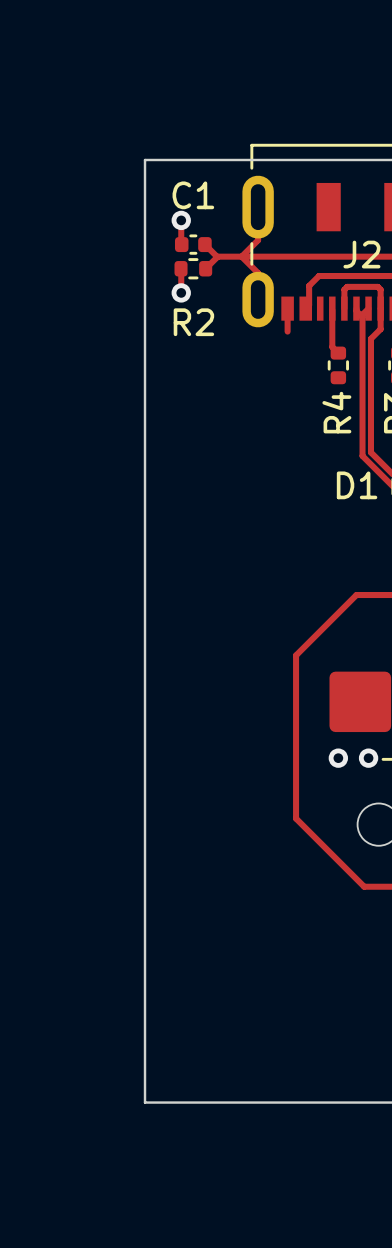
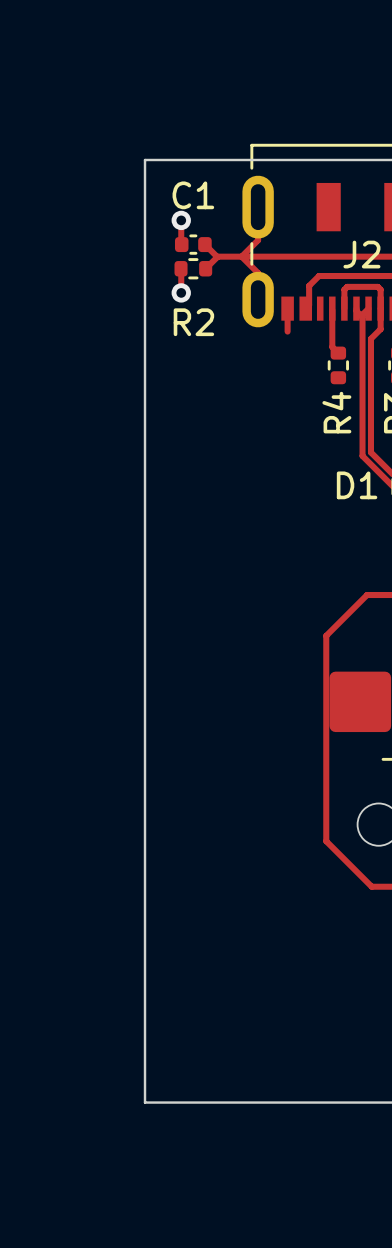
track: (367, 595) (356, 595) (296, 655) (296, 818) (364, 886) (371, 886) -> (367, 595) (326, 635) (326, 841) (371, 886)
via: (338, 758) -> none
via: (368, 758) -> none

